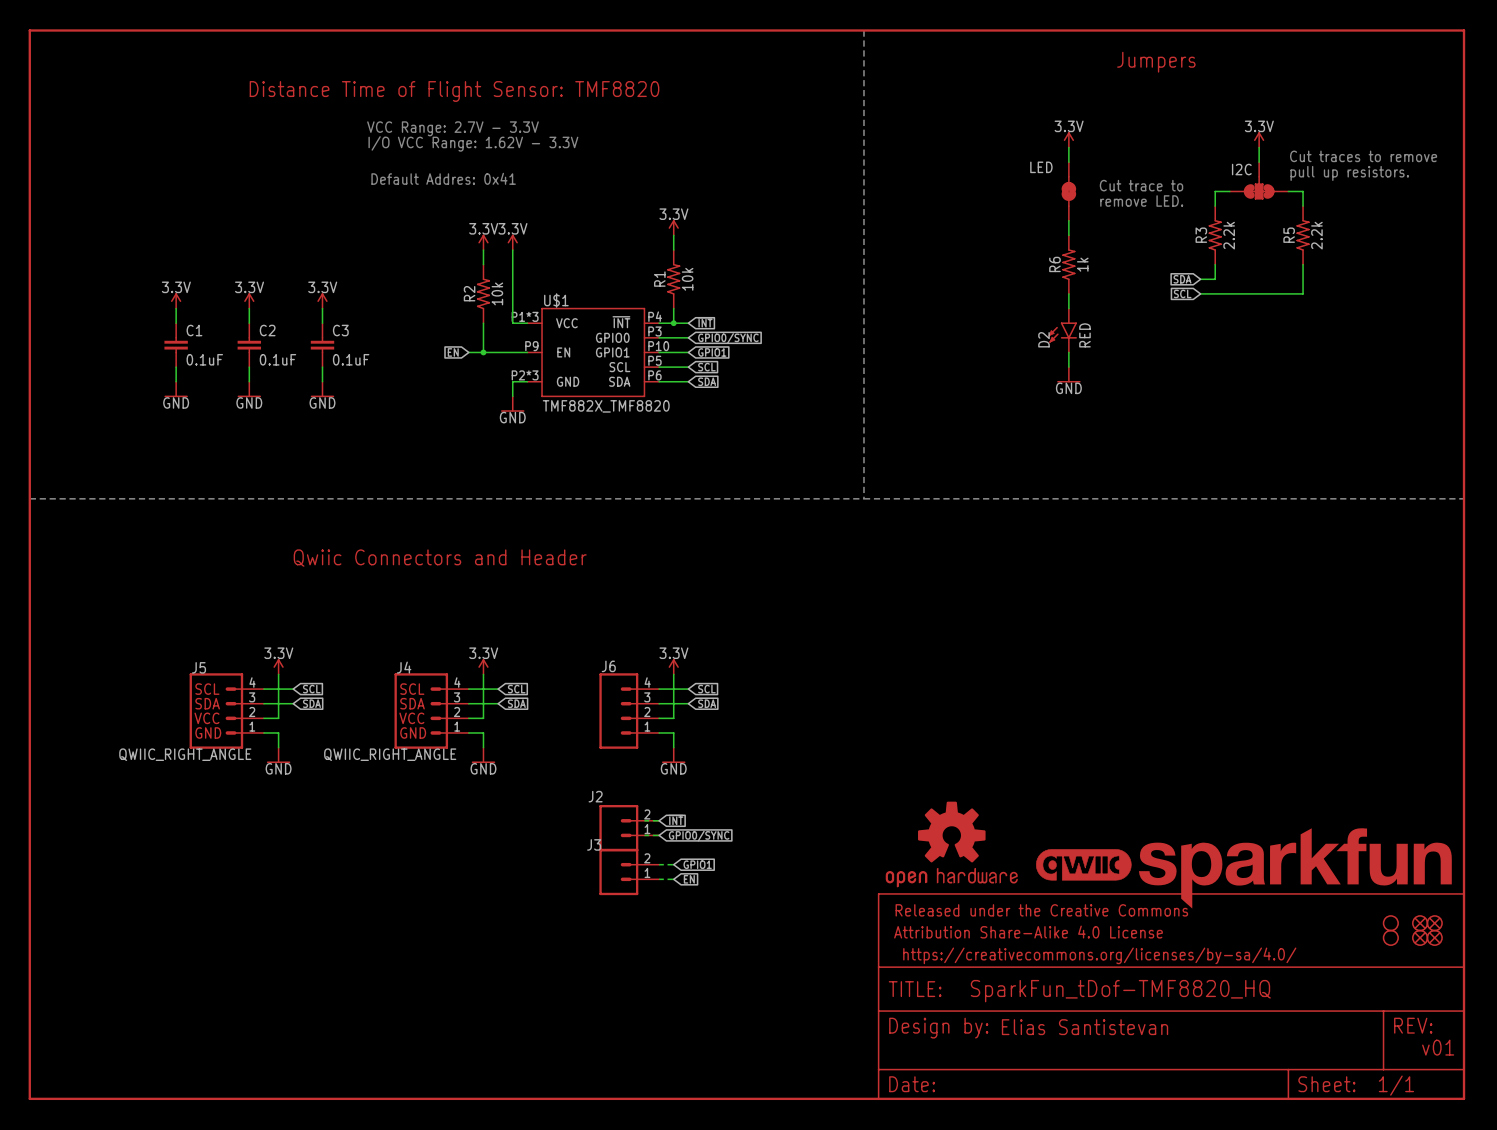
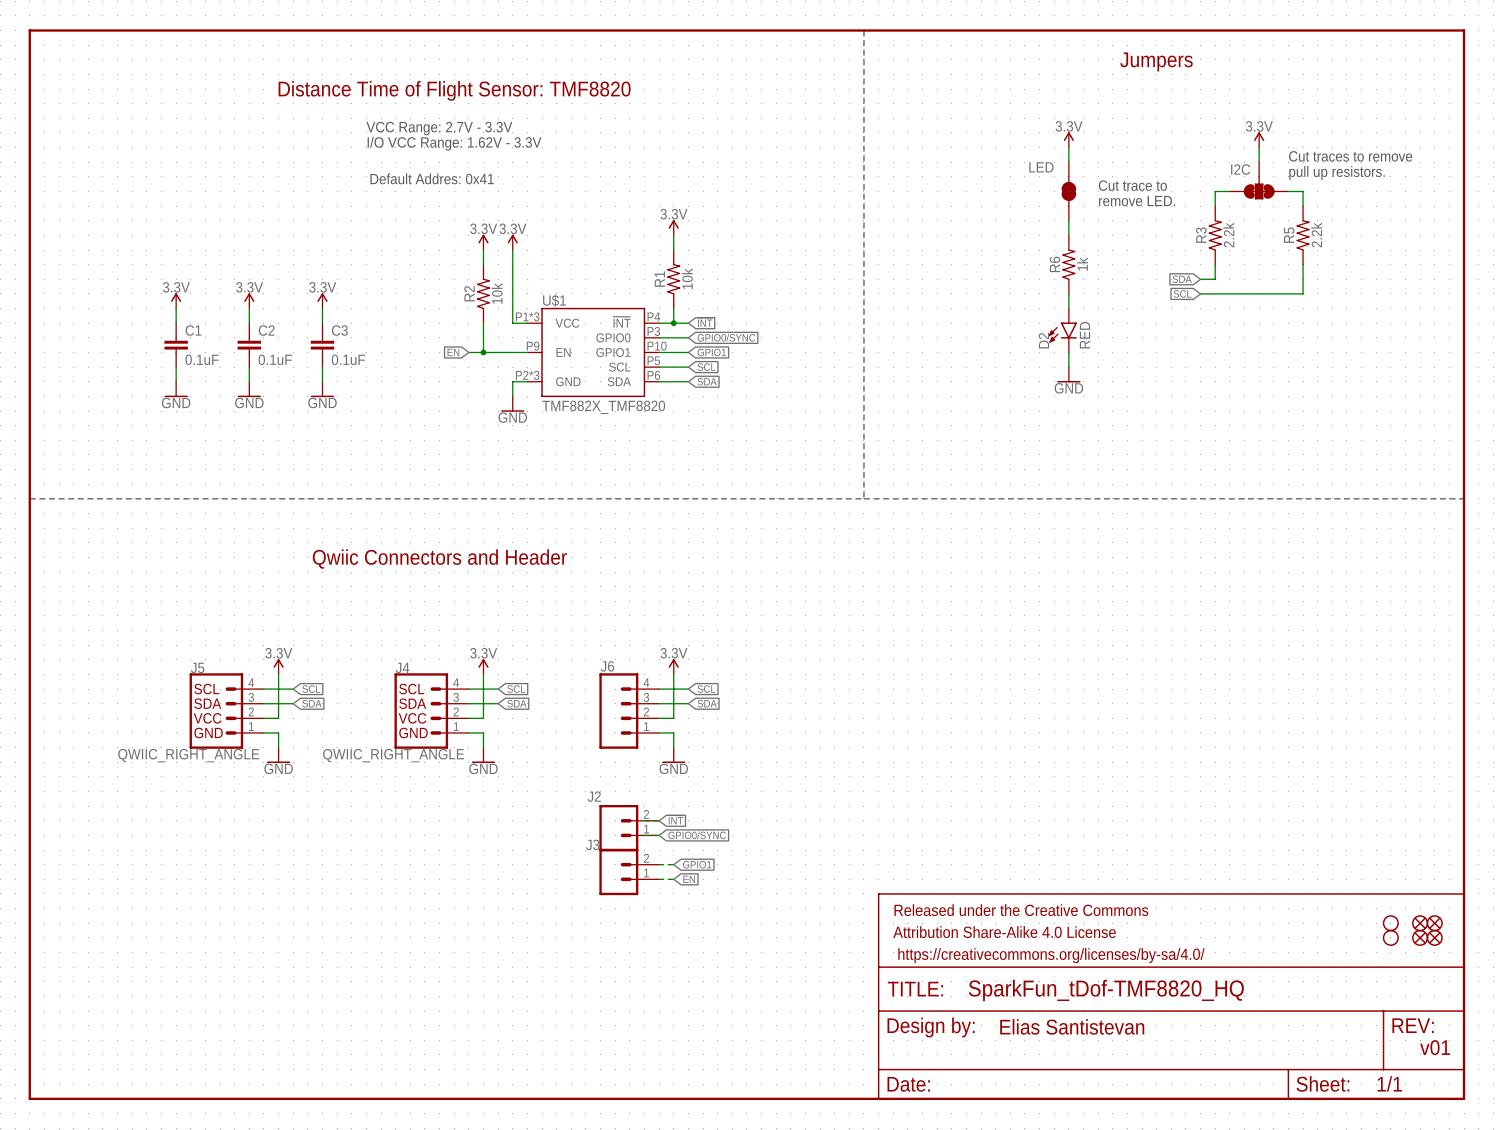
part: (951, 844) -> none
part: (1083, 864) -> none
part: (1295, 868) -> none

